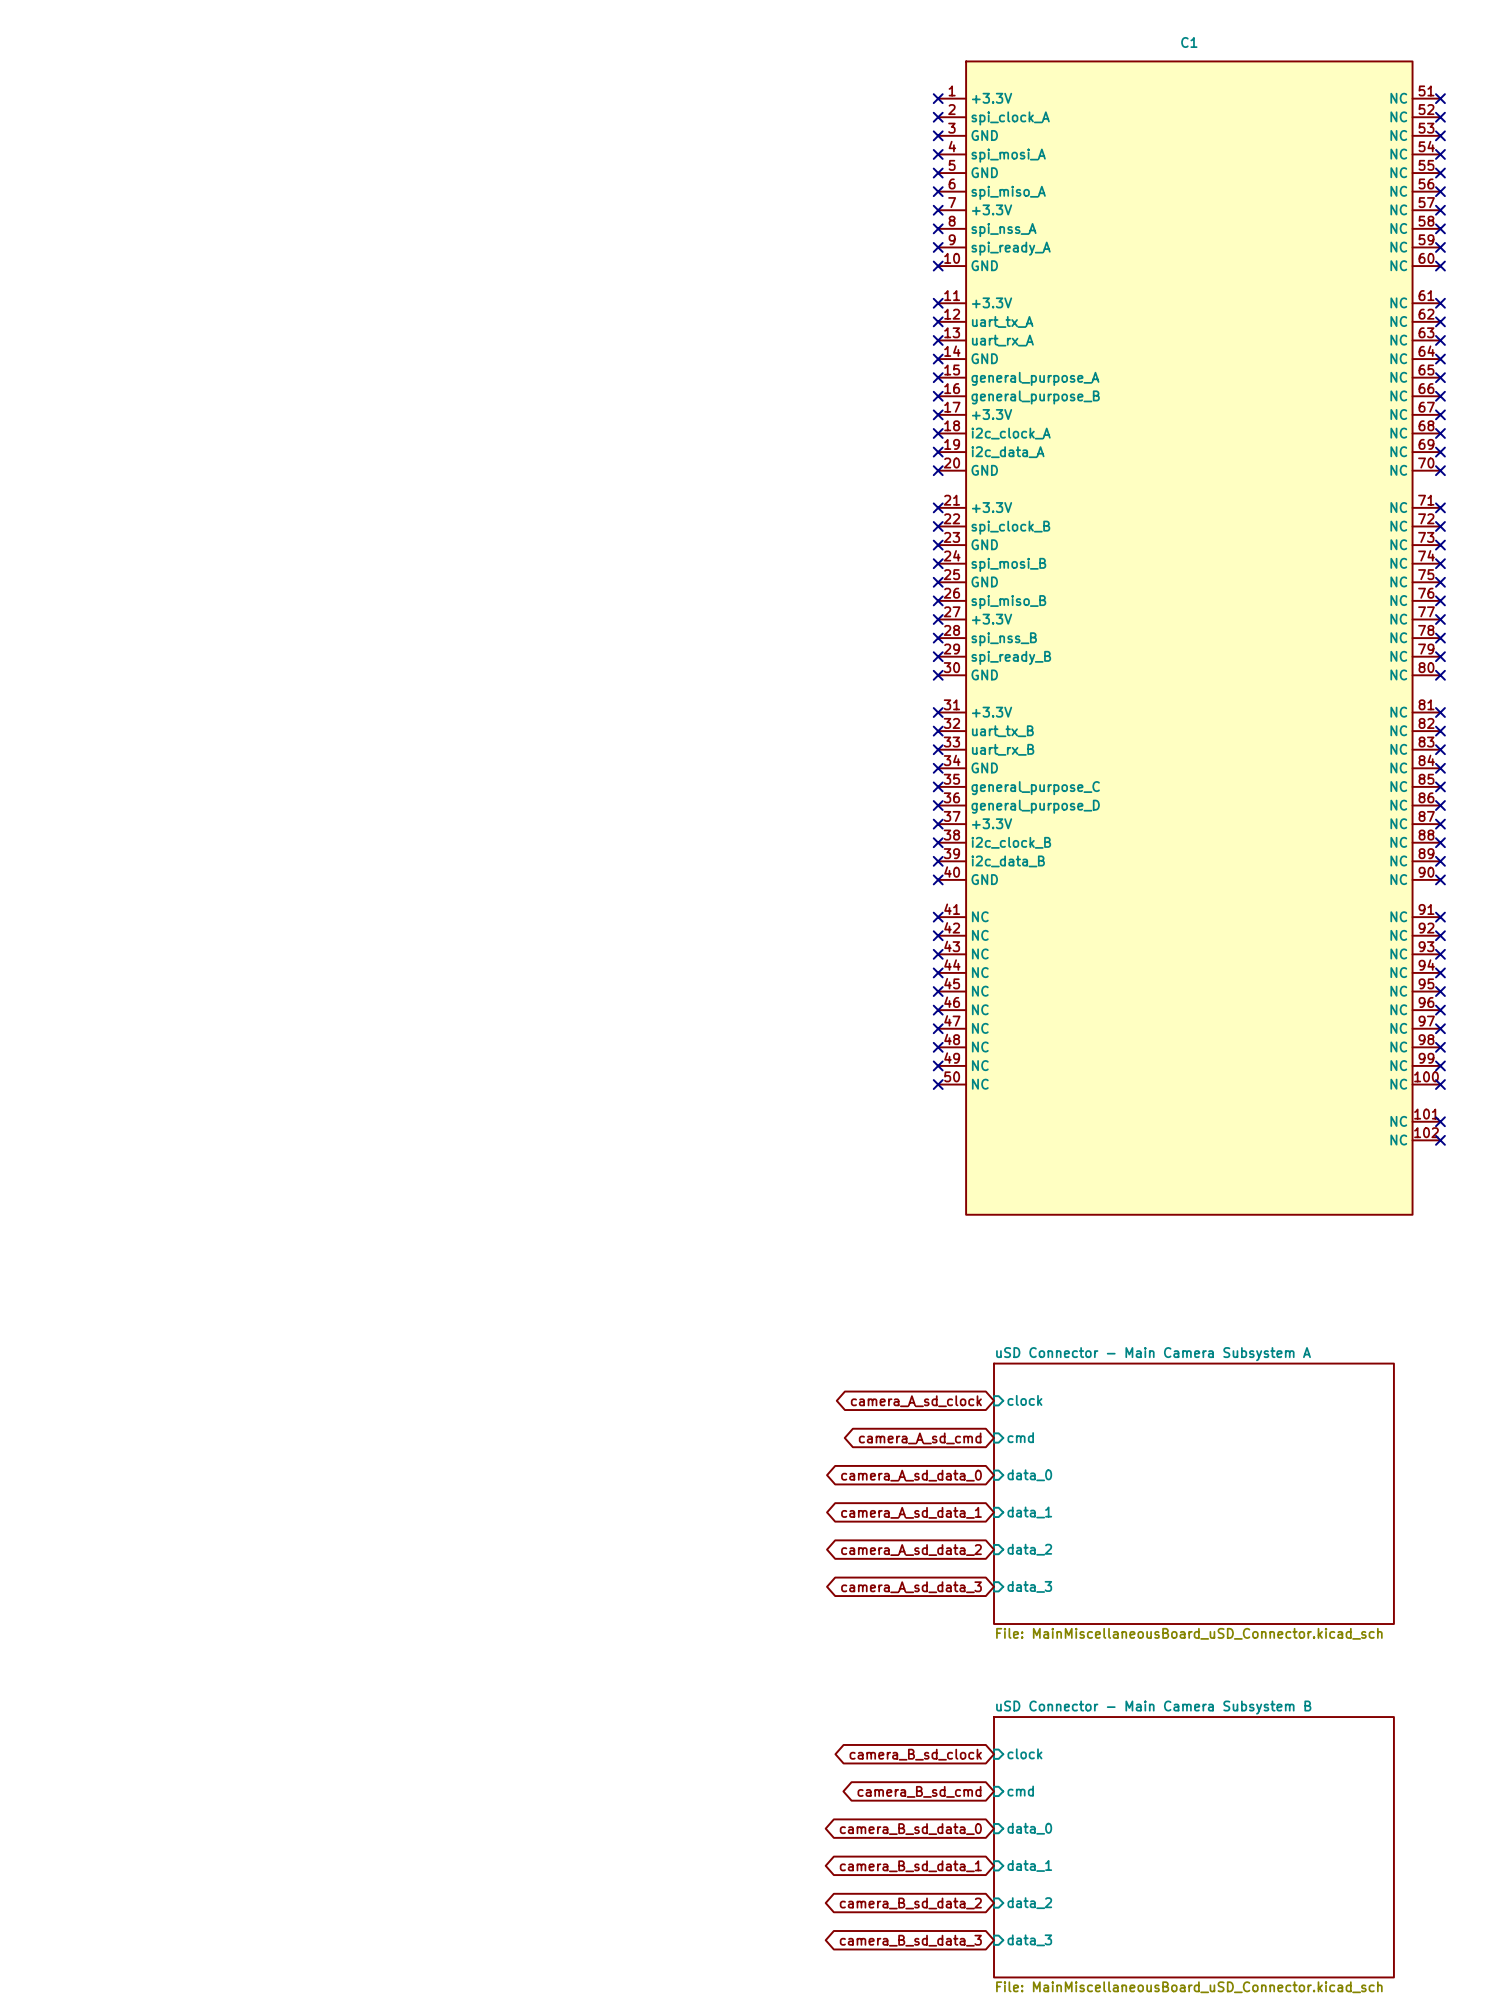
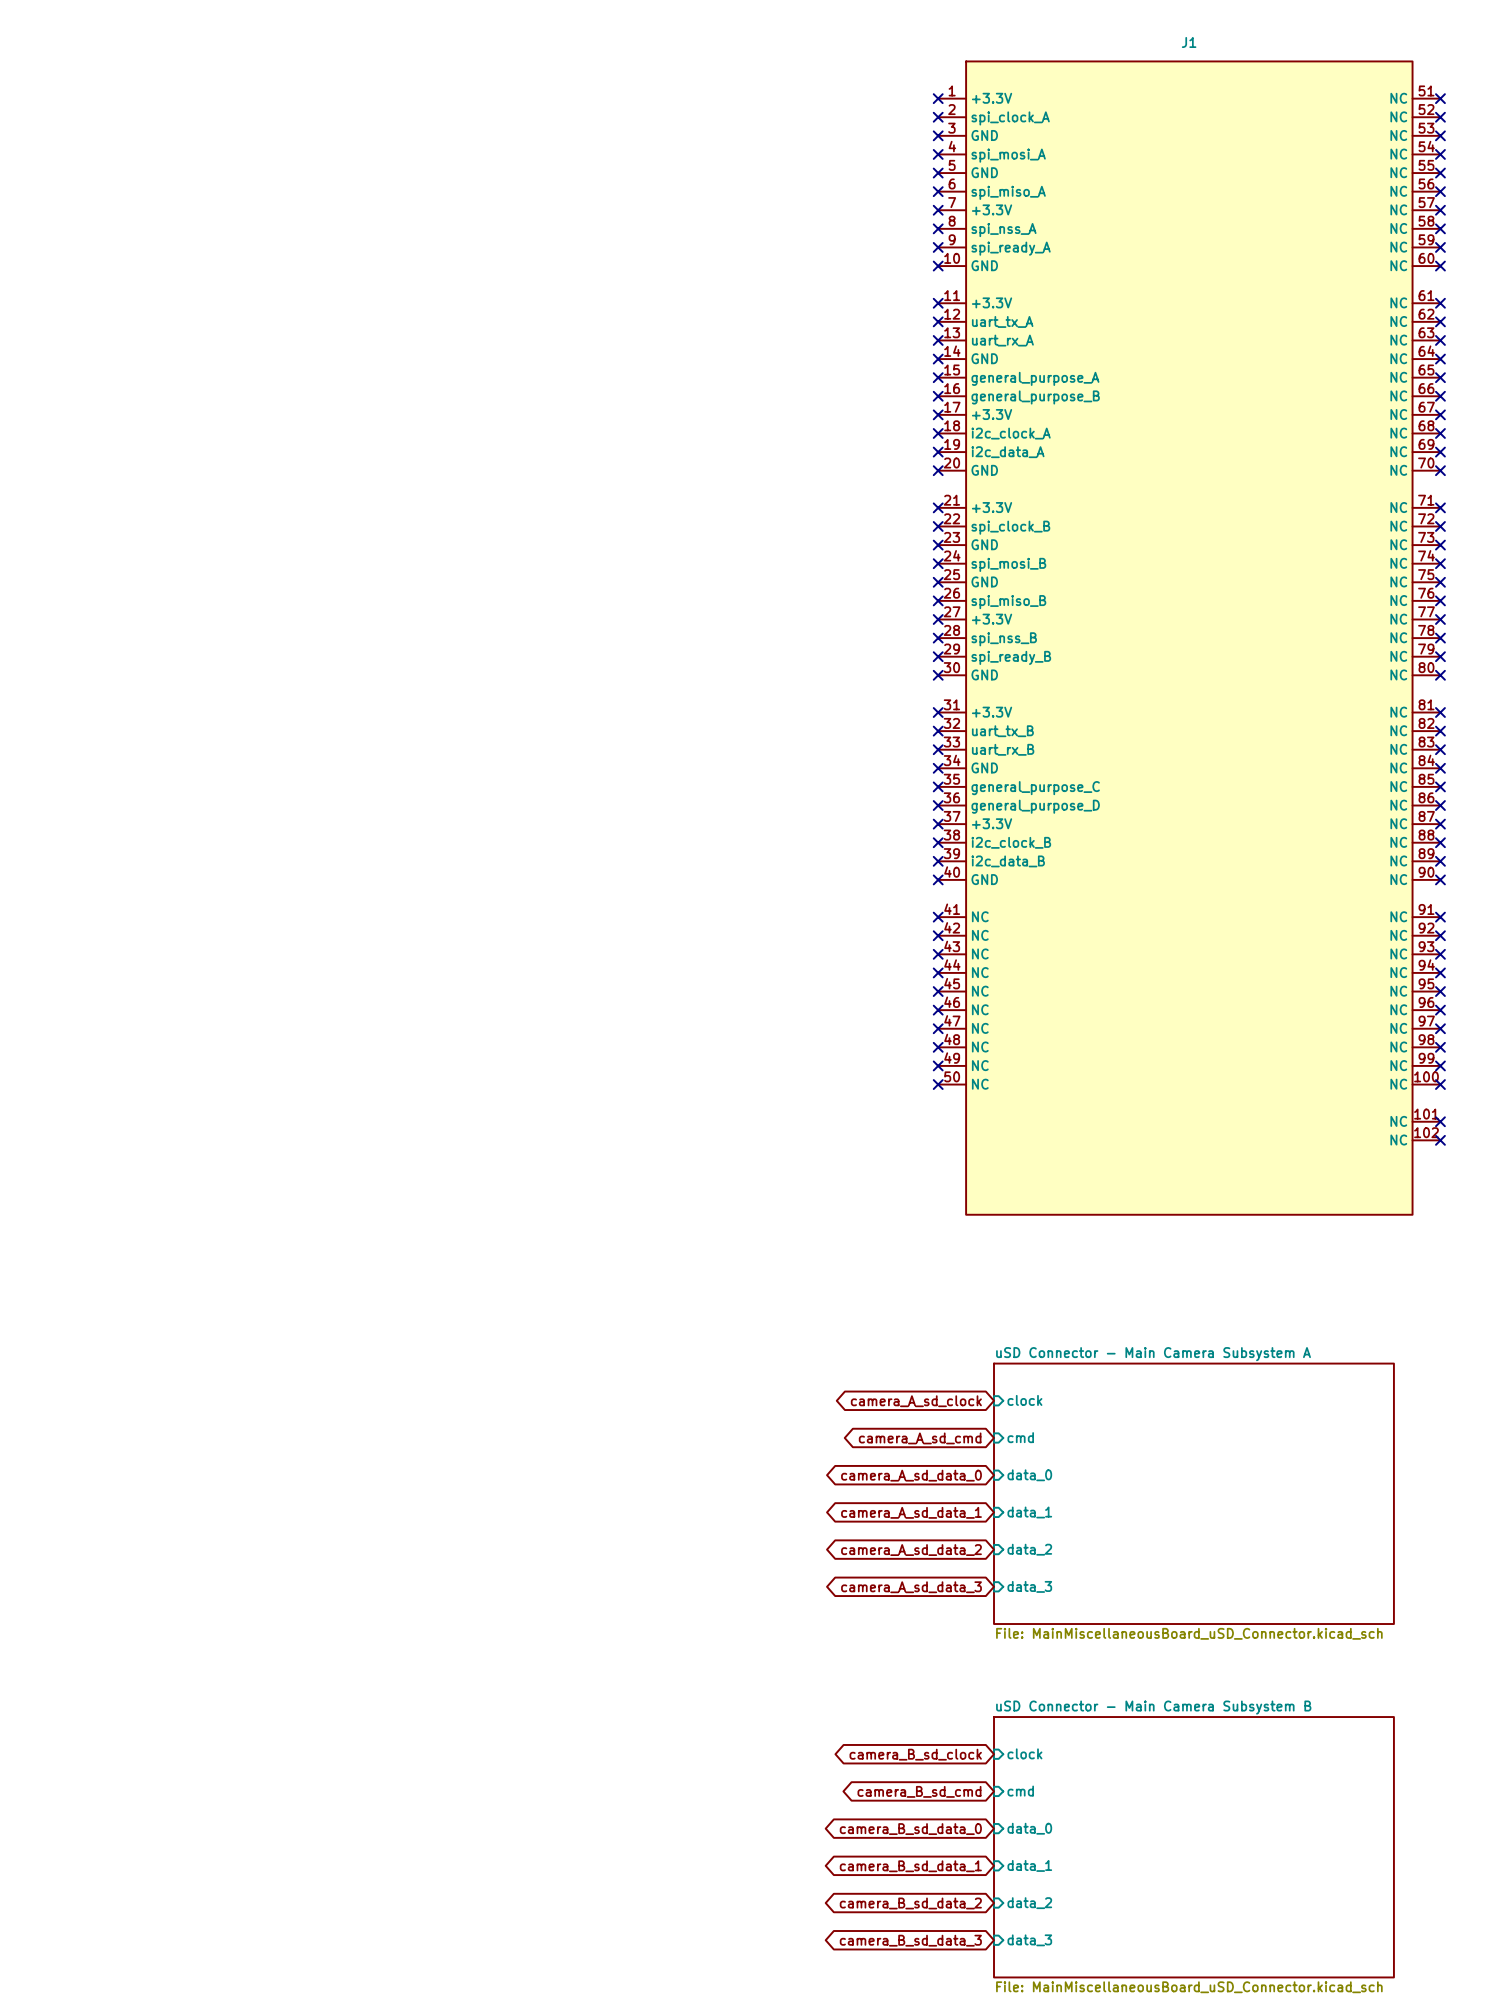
C1 name: C1 (1189, 42) -> J1 (1189, 42)

